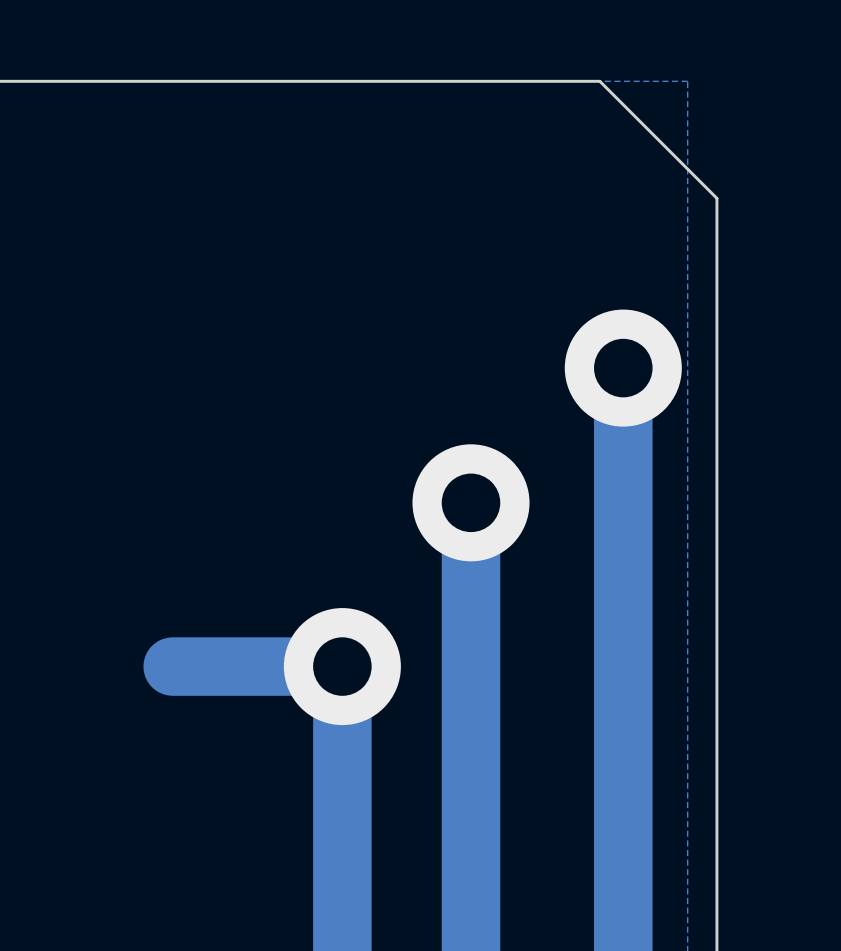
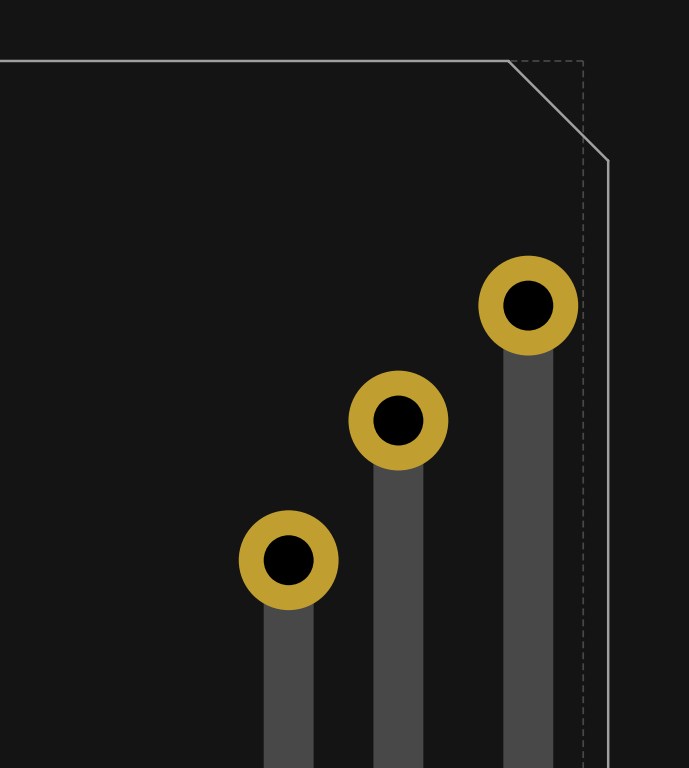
track: (342, 666) (172, 666) -> none

